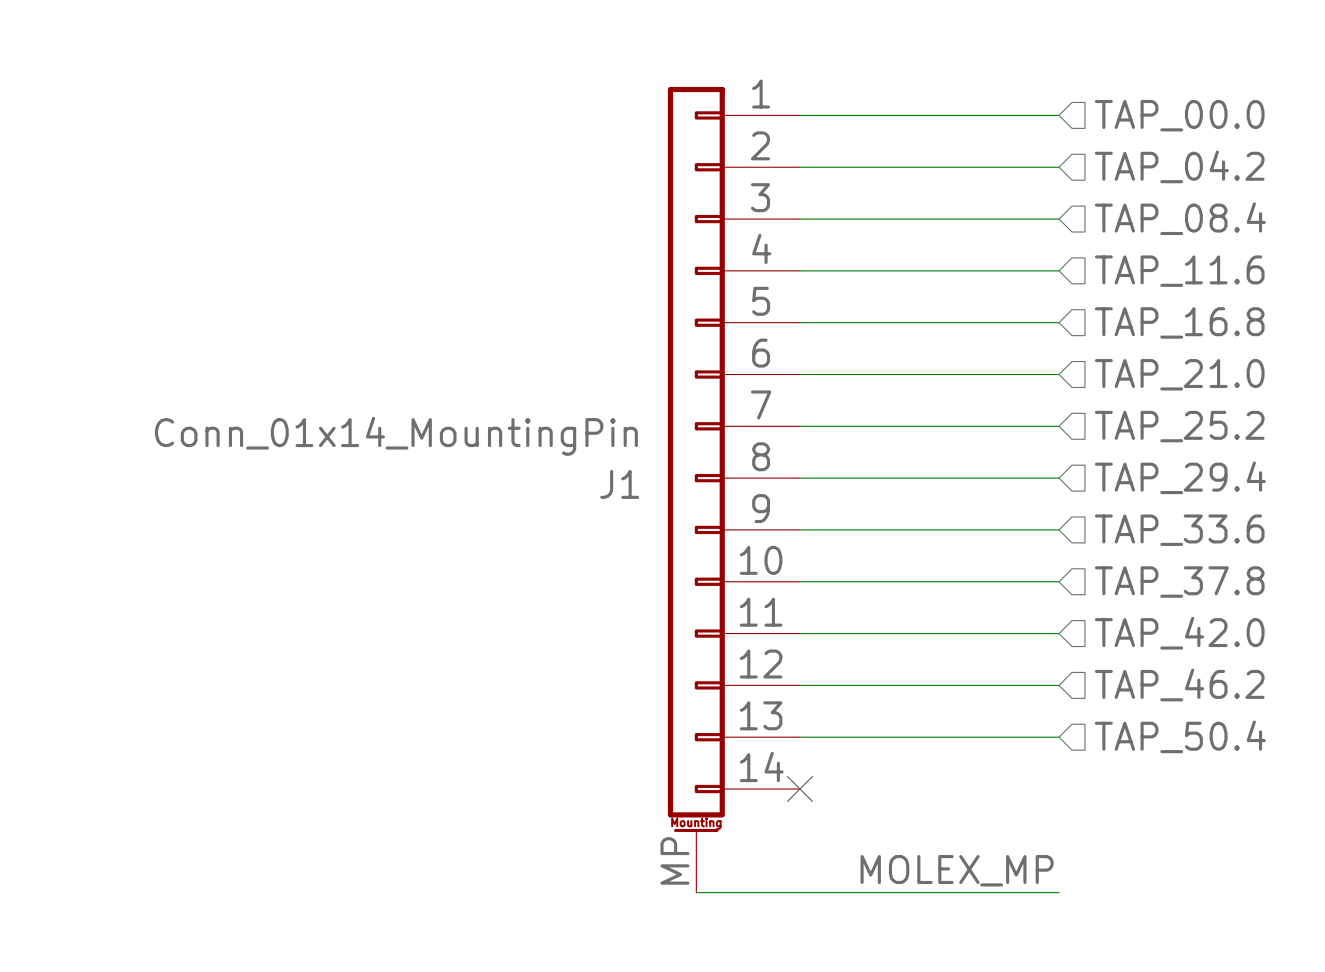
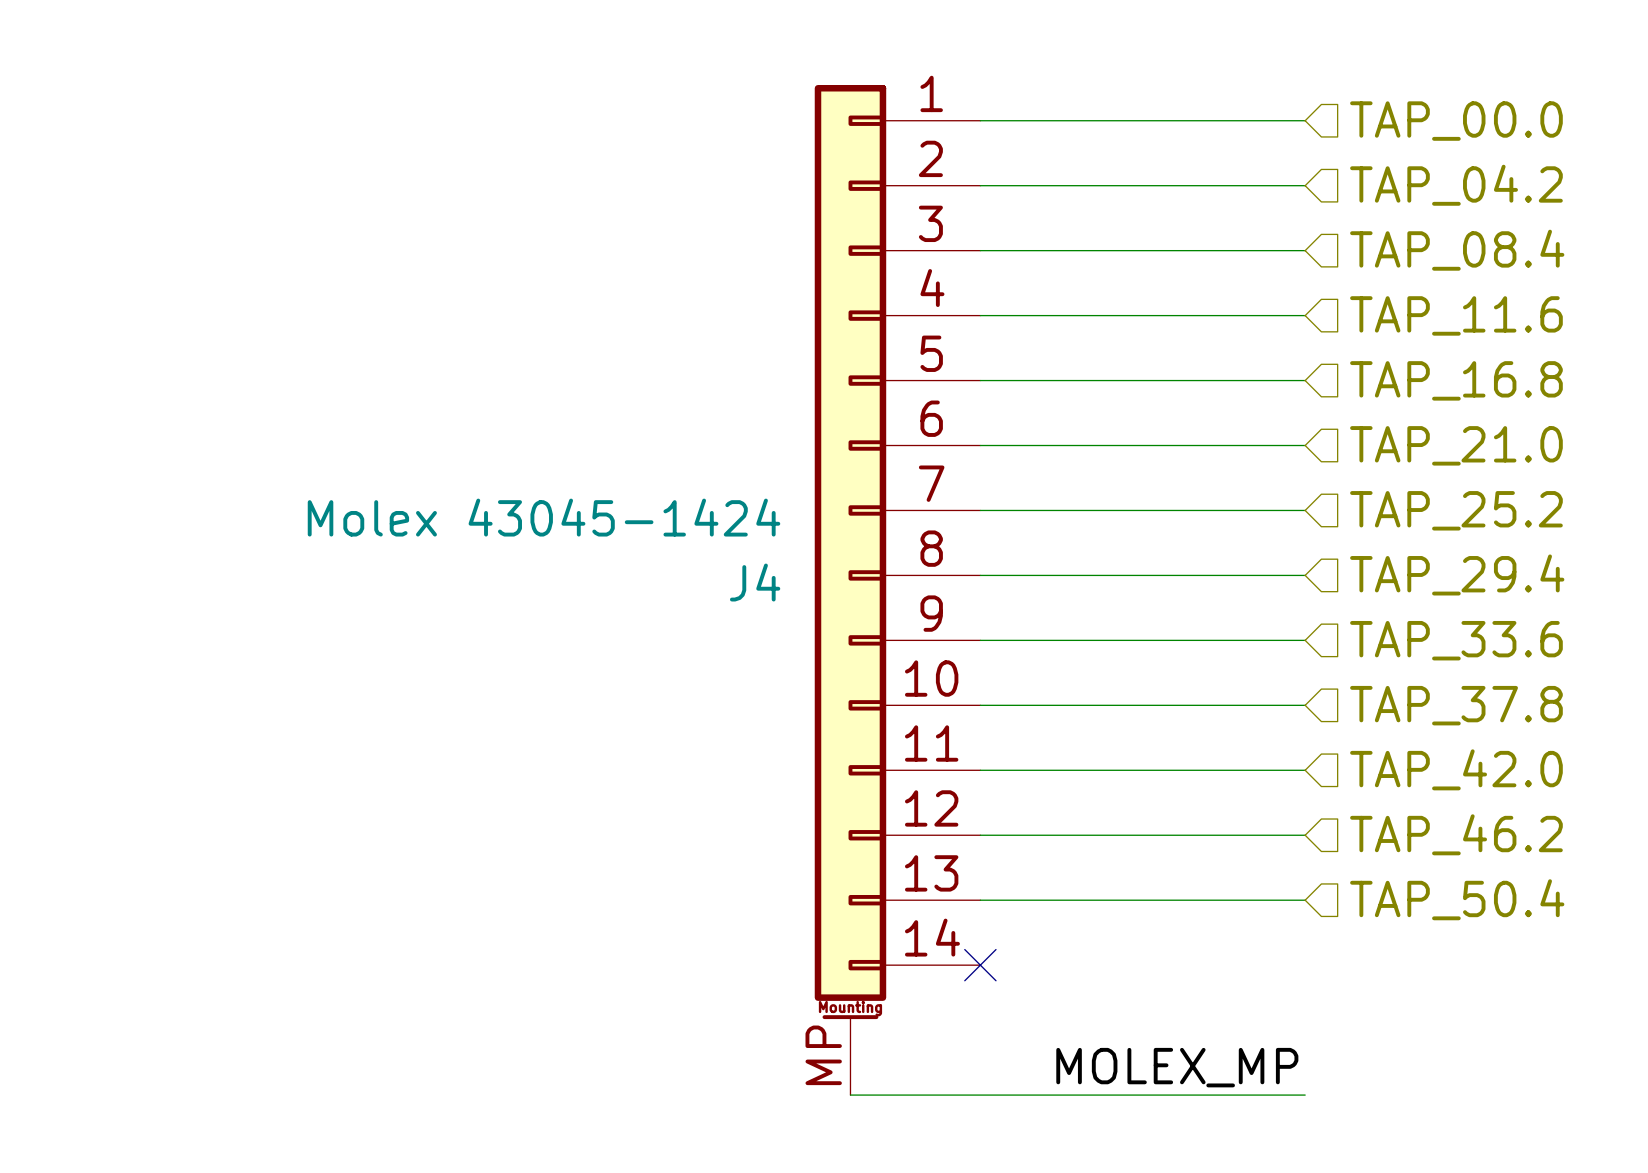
J1 value: Conn_01x14_MountingPin (396, 436) -> Molex 43045-1424 (544, 517)
J1 name: J1 (619, 484) -> J4 (755, 582)

